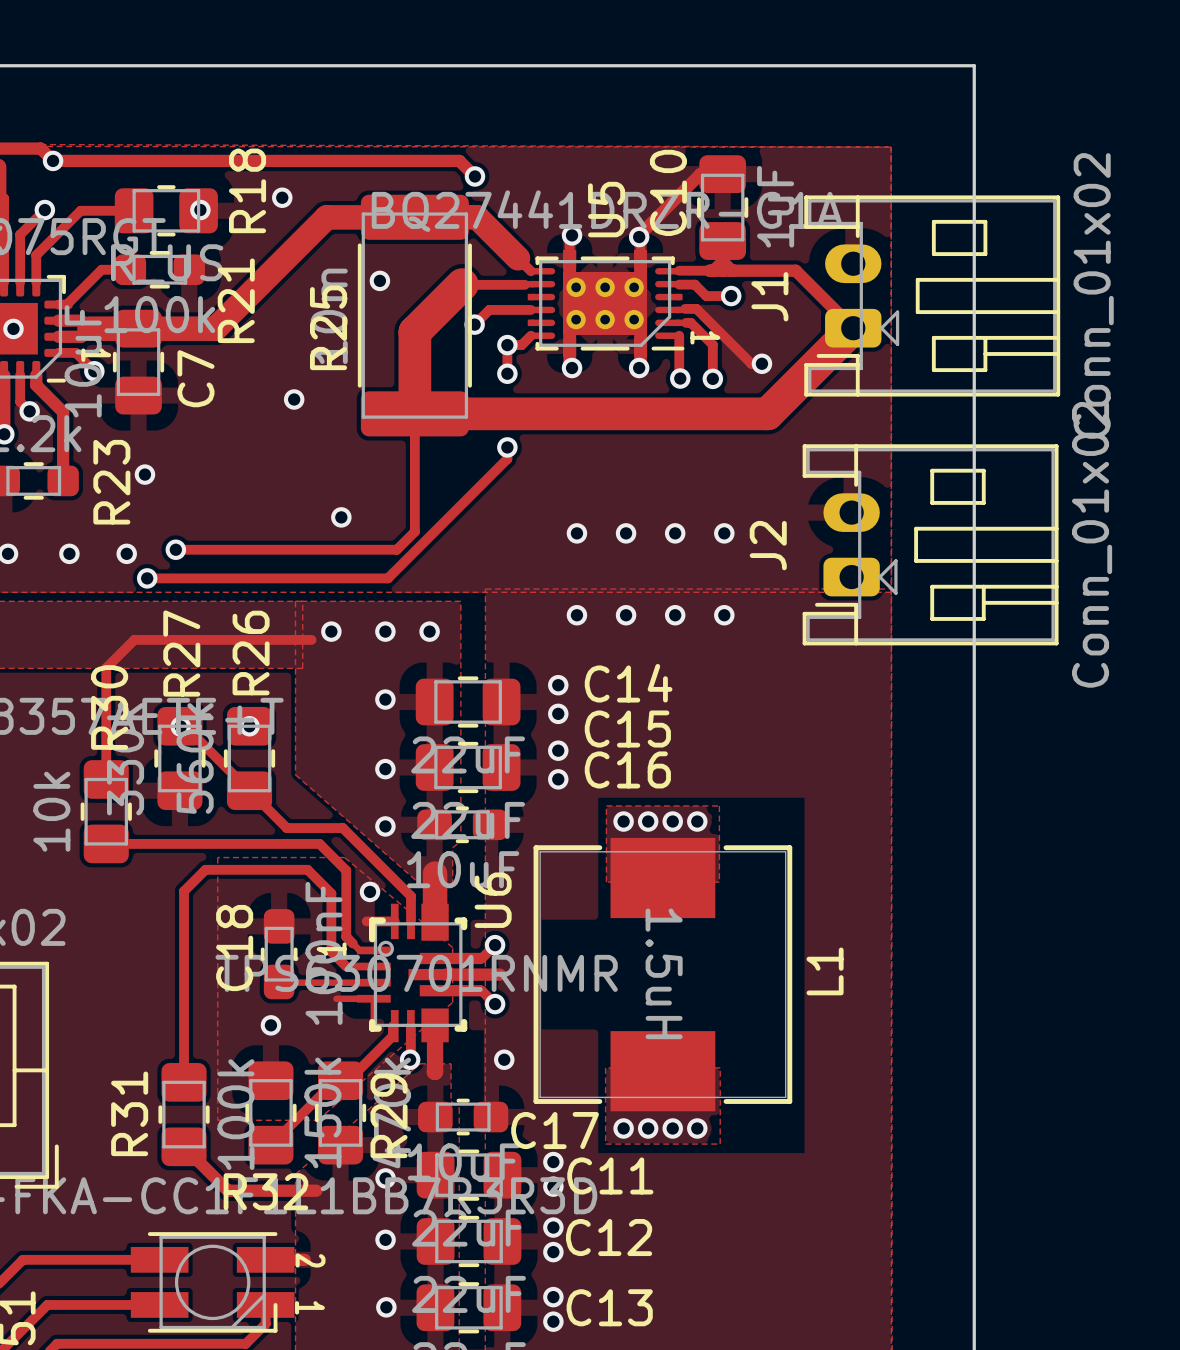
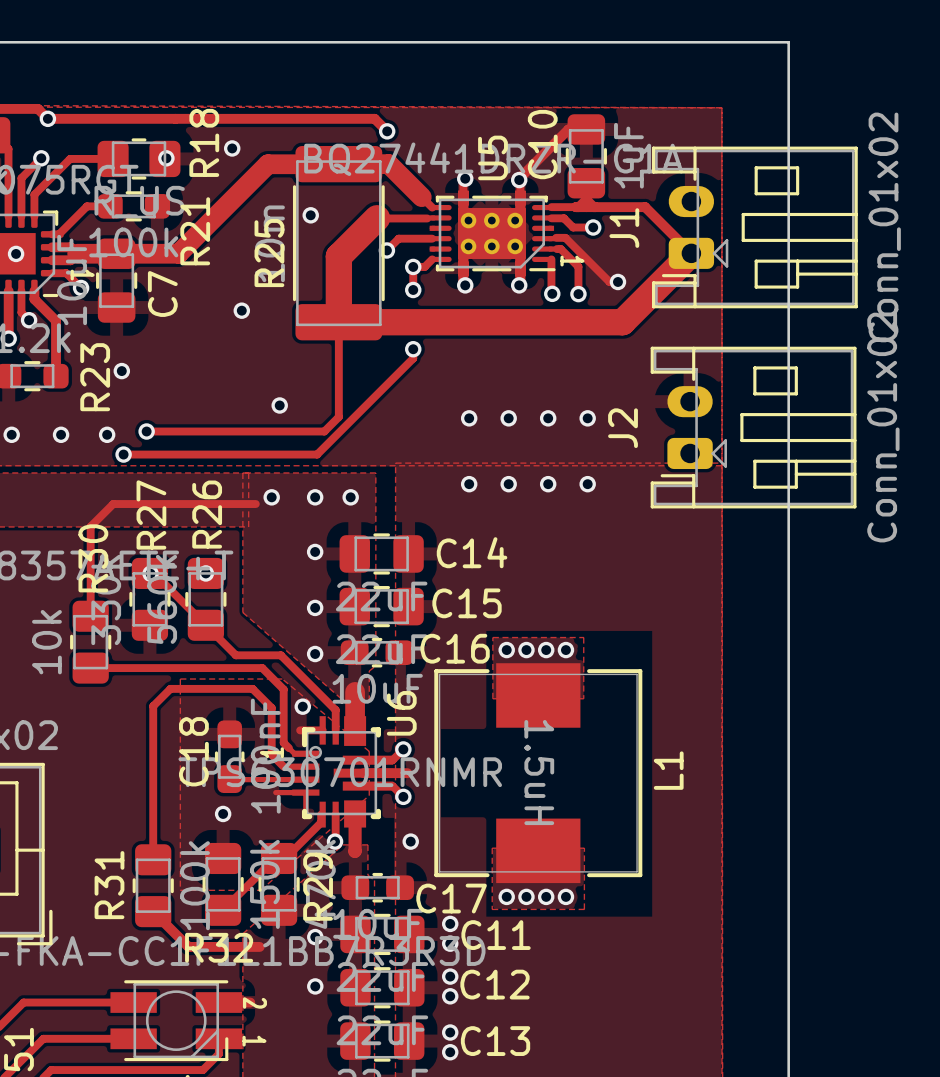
C14 name position: C14 (628, 683) -> C14 (472, 552)
via: (558, 685) -> none
via: (558, 713) -> none
C15 name position: C15 (627, 729) -> C15 (467, 603)
via: (558, 750) -> none
C16 name position: C16 (627, 769) -> C16 (455, 648)
via: (558, 779) -> none
via: (386, 1307) -> none

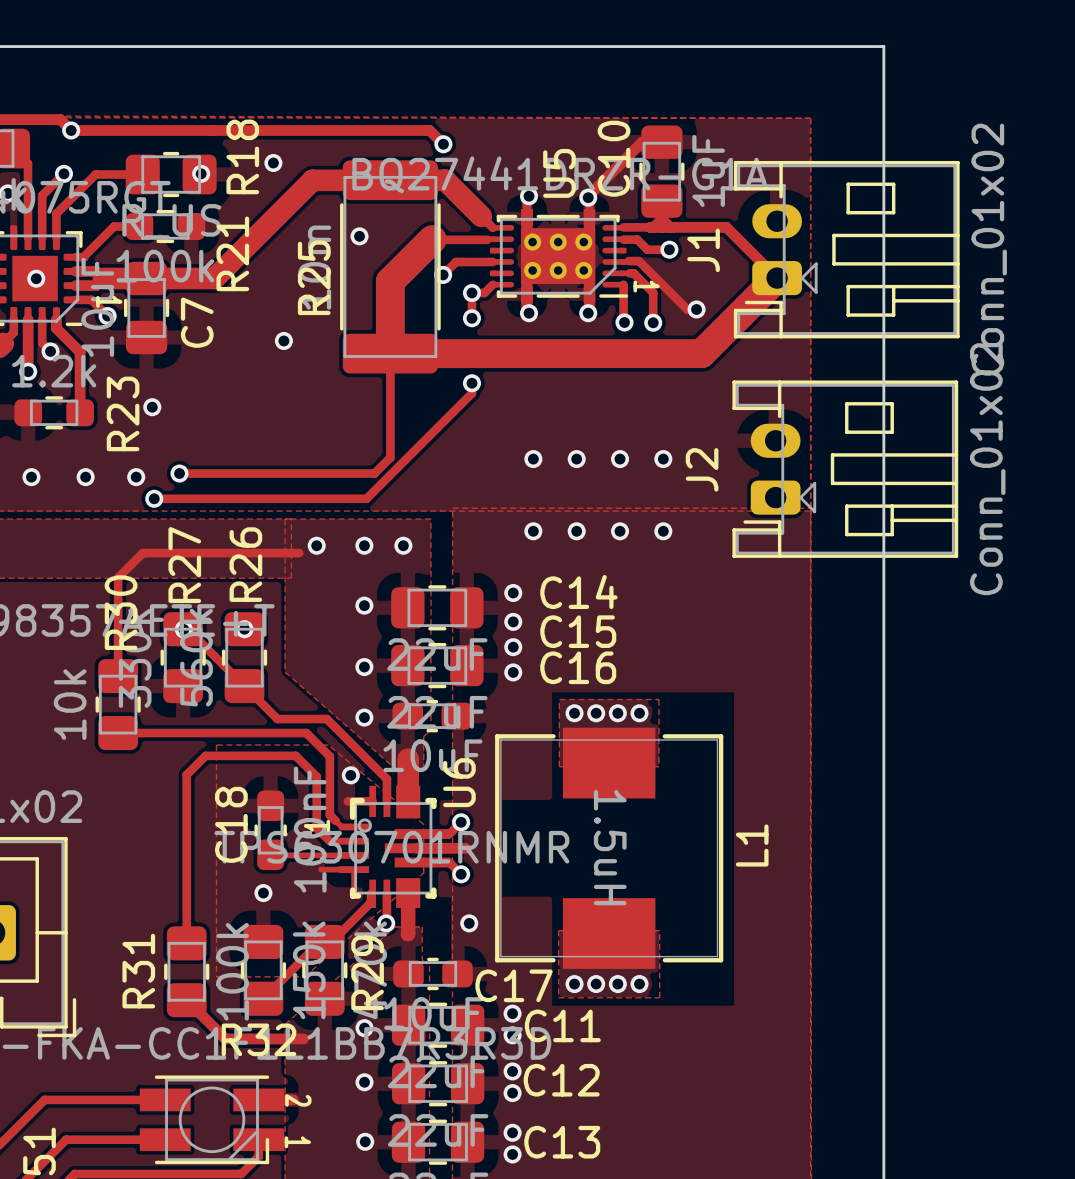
via: (279, 405) -> none
via: none -> (513, 593)
C14 name position: C14 (472, 552) -> C14 (578, 591)
via: none -> (513, 621)
via: none -> (513, 647)
C15 name position: C15 (467, 603) -> C15 (578, 631)
via: none -> (513, 672)
C16 name position: C16 (455, 648) -> C16 (578, 667)
via: none -> (365, 1141)

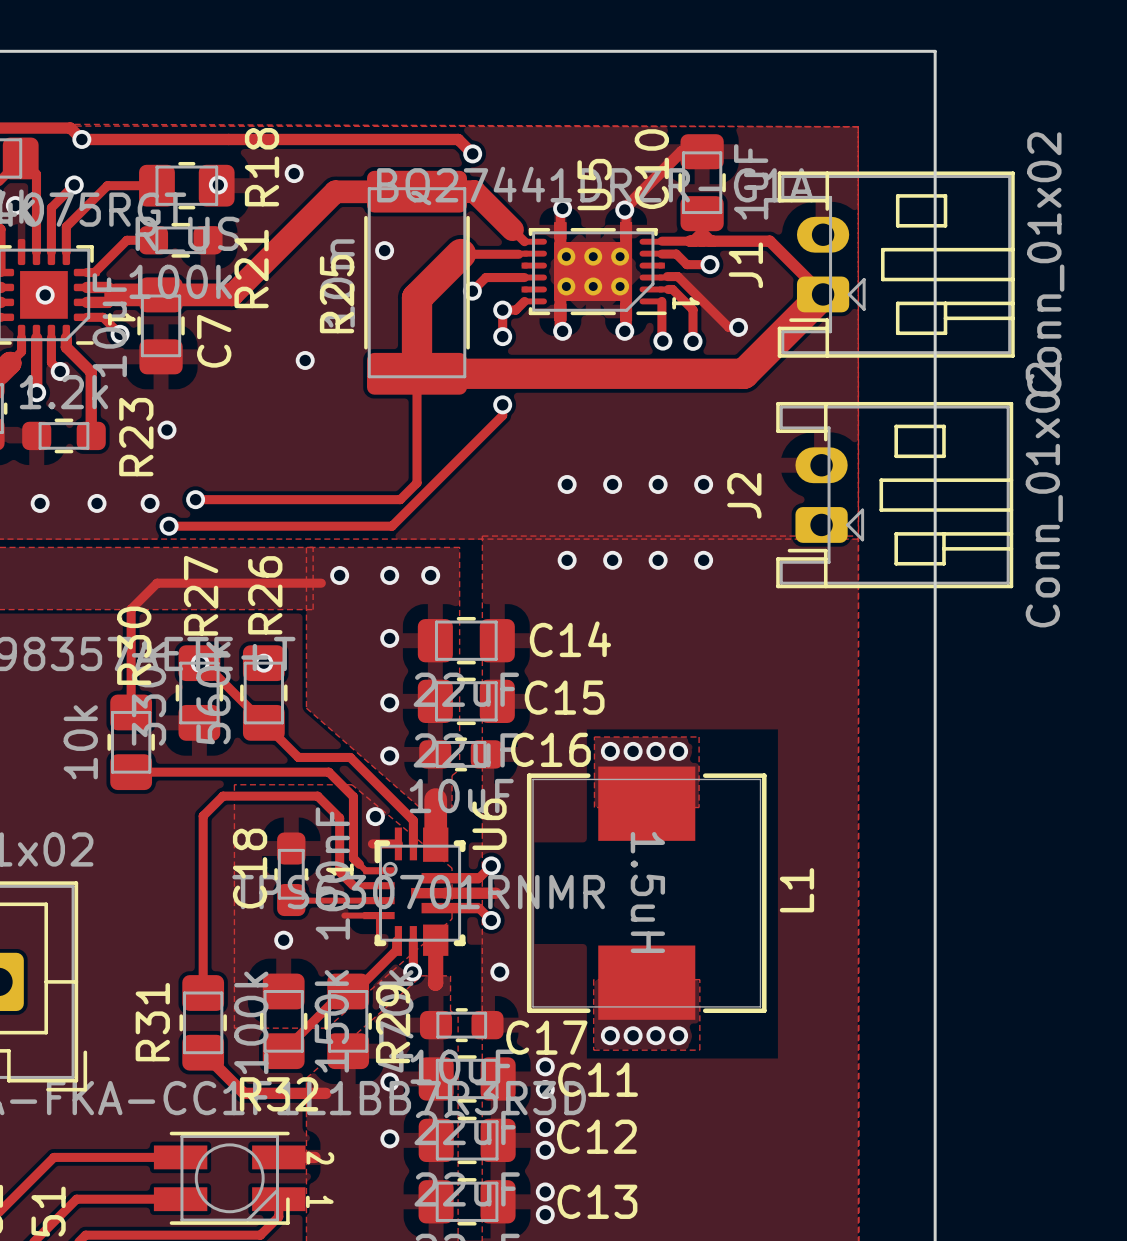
C14 name position: C14 (578, 591) -> C14 (570, 639)
via: (513, 593) -> none
via: (513, 621) -> none
C15 name position: C15 (578, 631) -> C15 (564, 697)
via: (513, 647) -> none
C16 name position: C16 (578, 667) -> C16 (550, 749)
via: (513, 672) -> none
via: (365, 1141) -> none

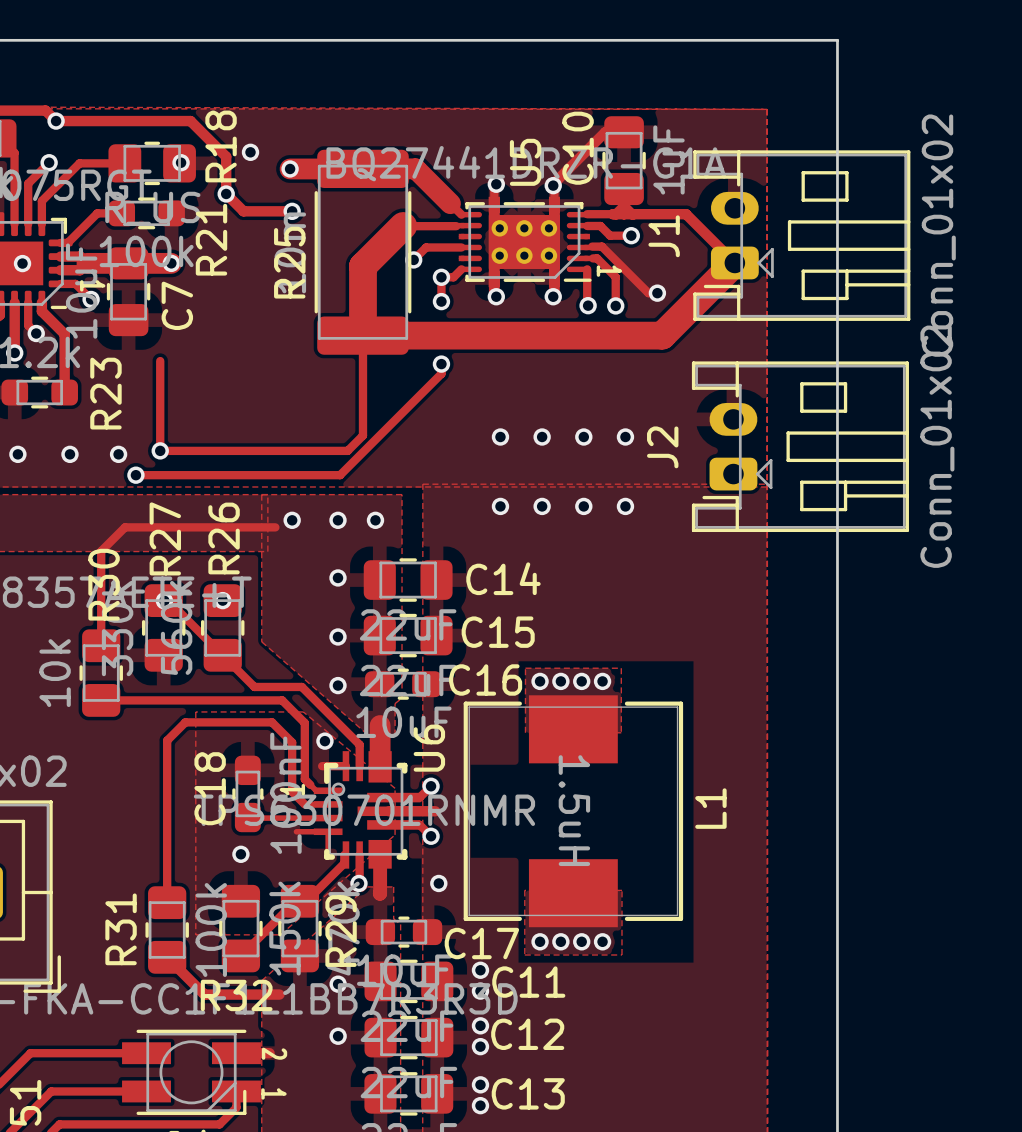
track: (228, 139) (458, 139) (472, 153) -> (190, 121) (226, 156) (226, 193) (243, 211) (292, 211)
via: (472, 153) -> none
track: (337, 191) (232, 294) (207, 294) -> none
via: none -> (290, 168)
via: none -> (226, 193)
via: none -> (292, 211)
via: (384, 250) -> none
via: none -> (171, 263)
via: (305, 360) -> none
track: none -> (160, 361) (160, 450)
via: (167, 430) -> none

